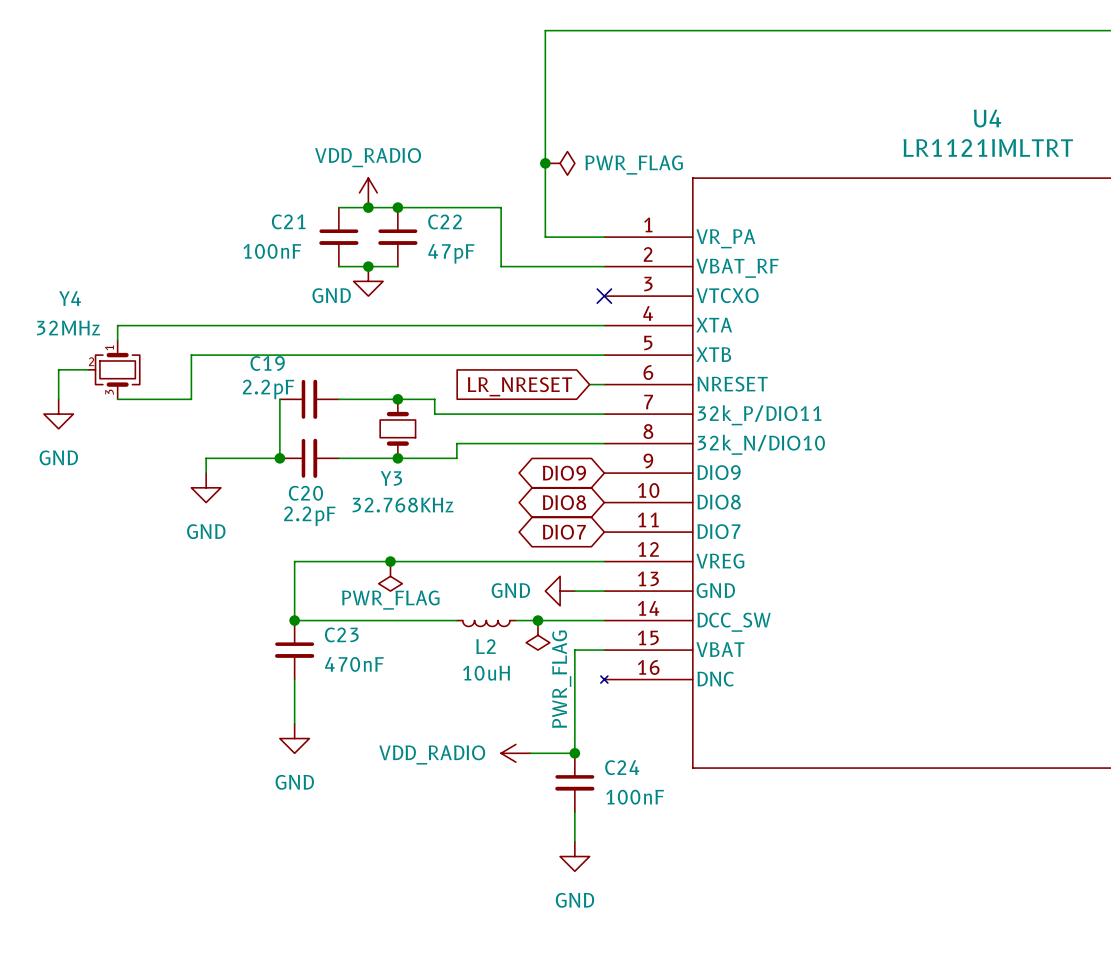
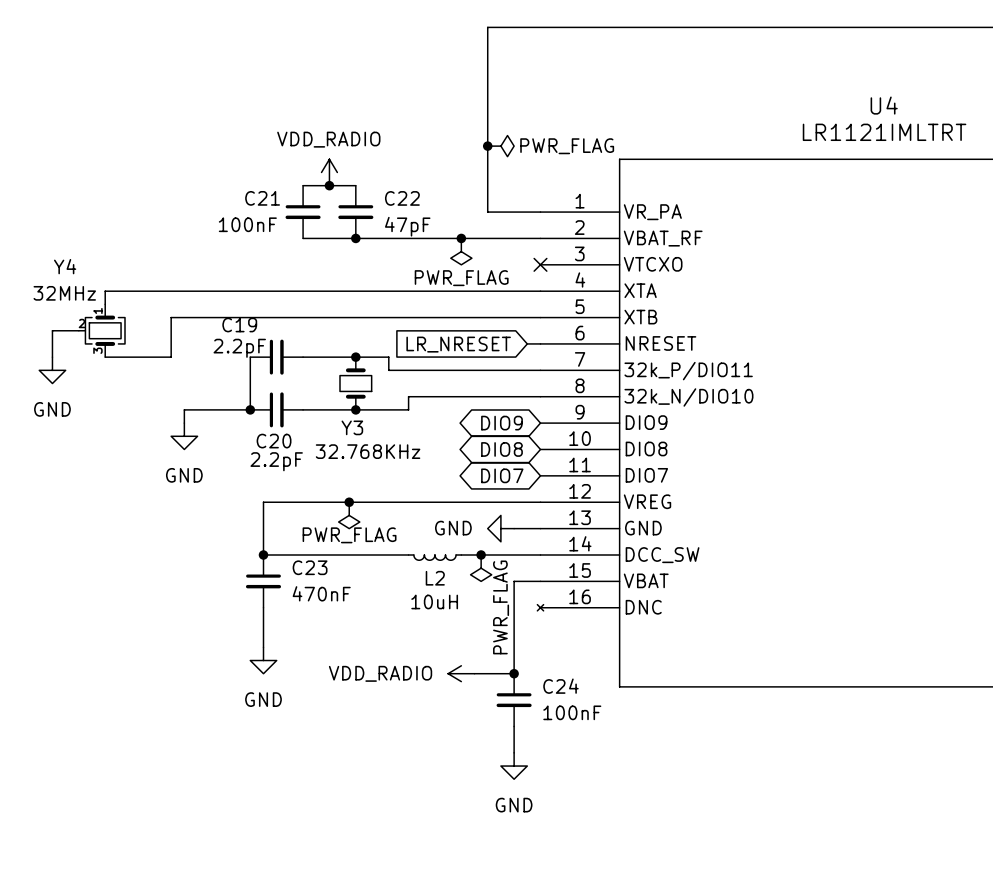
wire: (397, 207) (501, 207) (501, 266) -> (355, 238) (448, 238)
junction: (397, 207) -> none
junction: (368, 266) -> none
junction: none -> (355, 238)
junction: none -> (461, 238)
power symbol: GND (368, 281) -> none
power symbol: none -> PWR_FLAG (461, 251)

